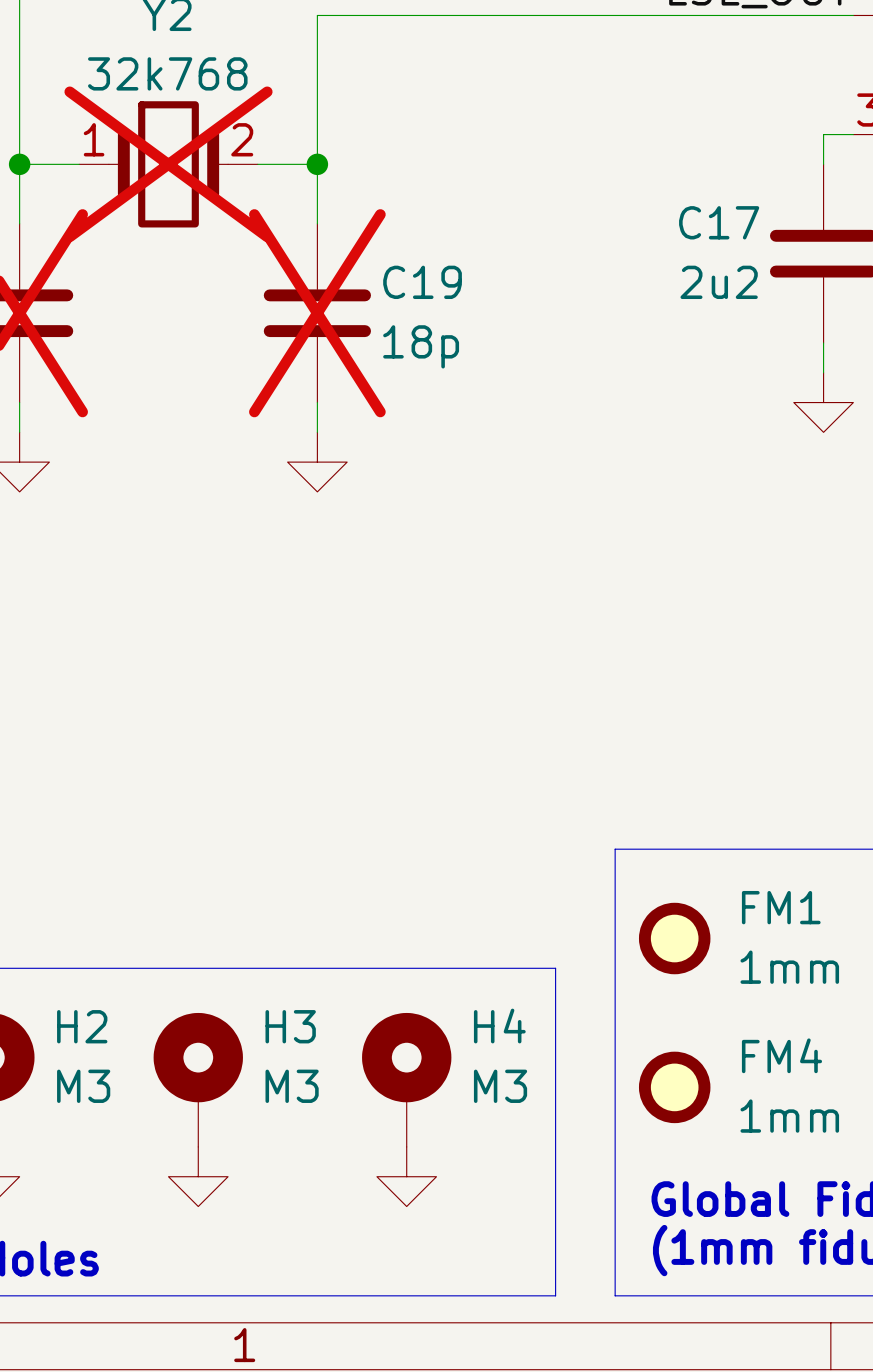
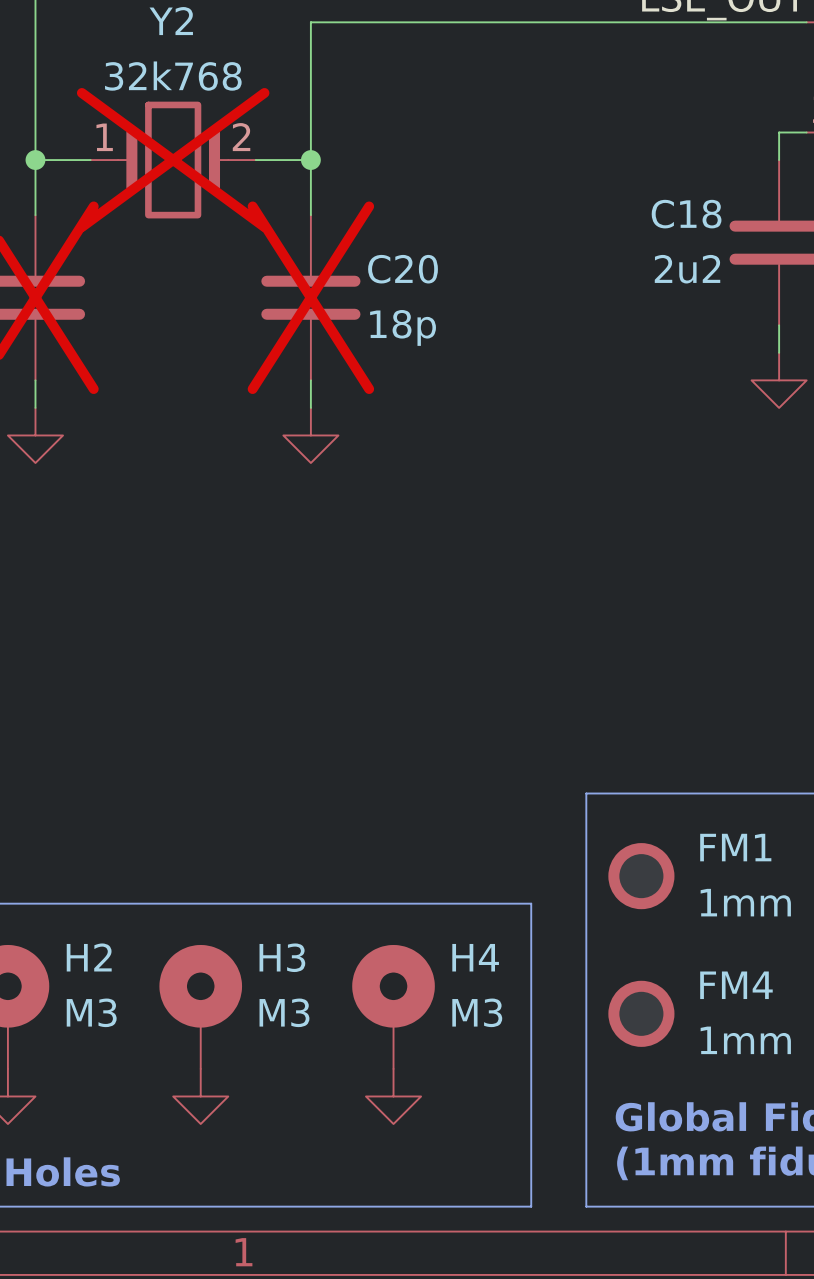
C17 name: C17 (719, 222) -> C18 (686, 214)
C19 name: C19 (422, 282) -> C20 (403, 269)

